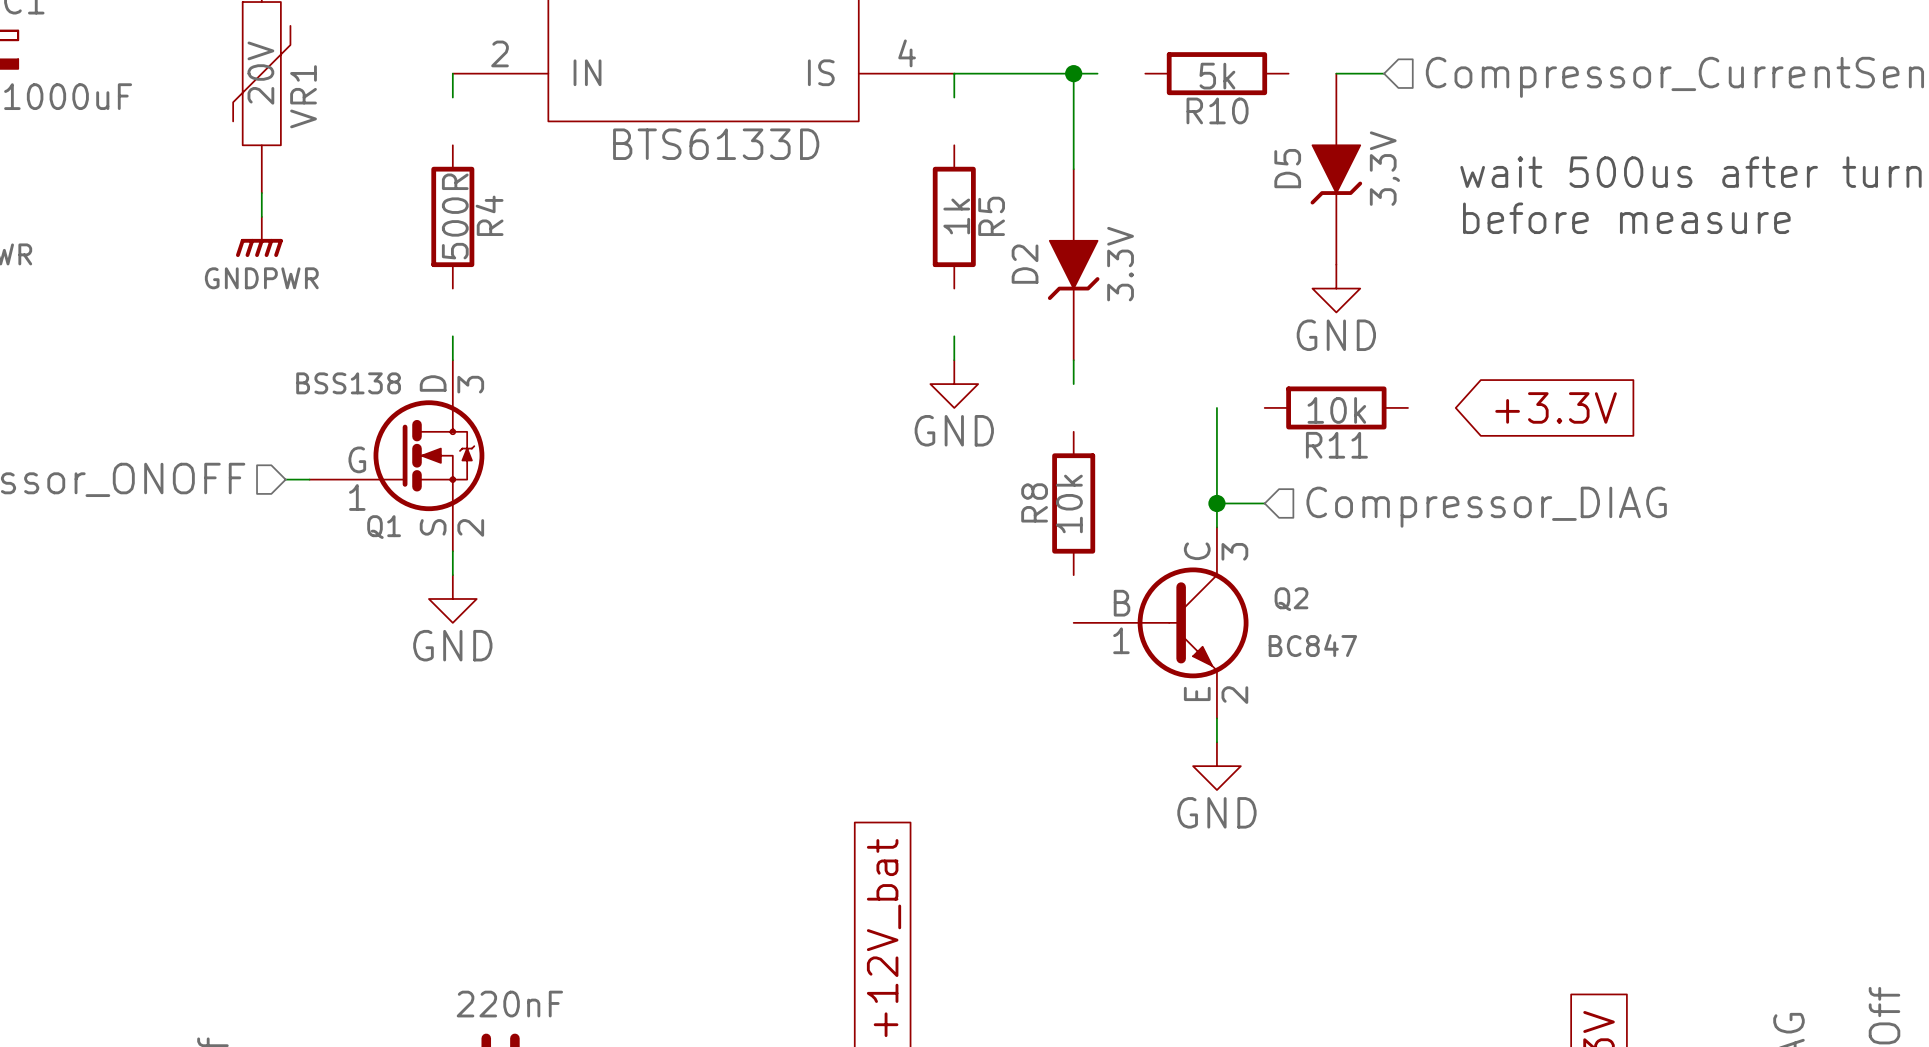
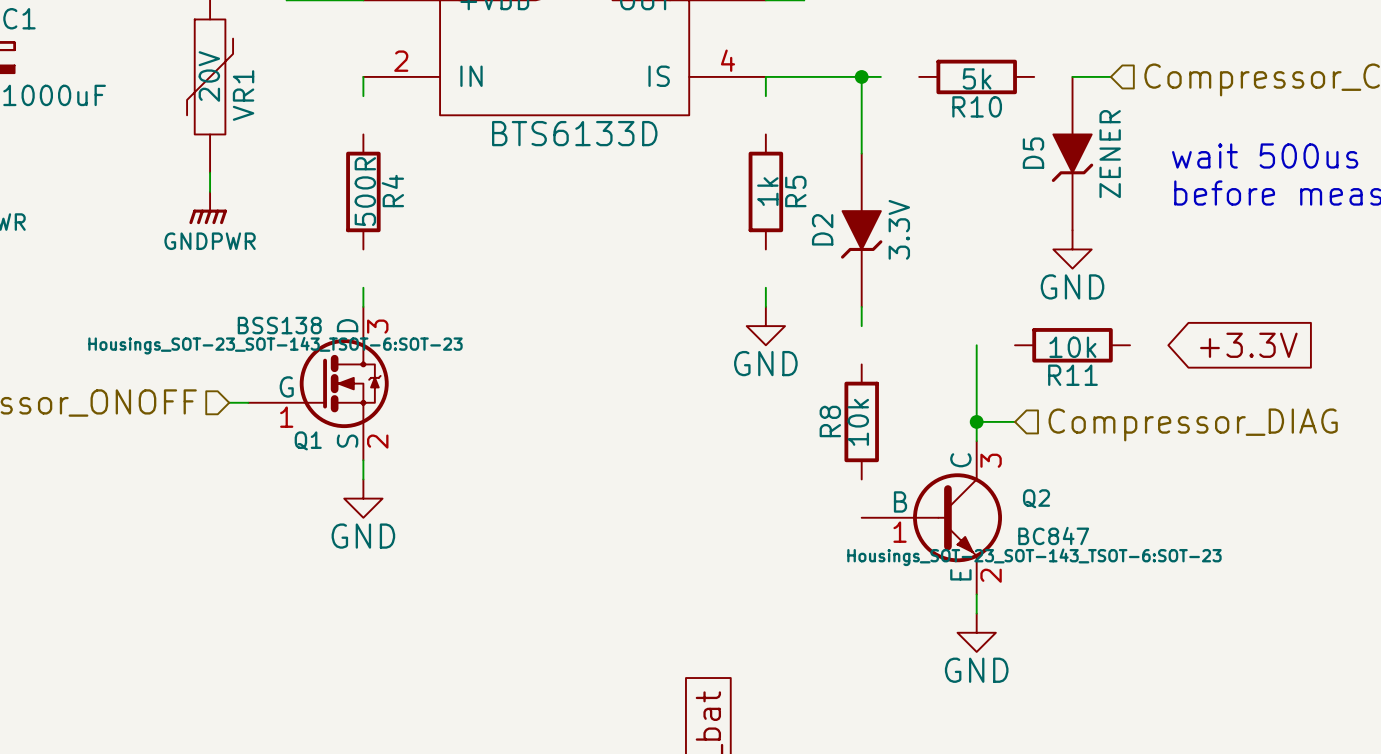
D5 value: 3,3V (1384, 168) -> ZENER (1110, 154)
Q1 text: none -> Housings_SOT-23_SOT-143_TSOT-6:SOT-23 (275, 345)
Q2 text: none -> Housings_SOT-23_SOT-143_TSOT-6:SOT-23 (1034, 557)

